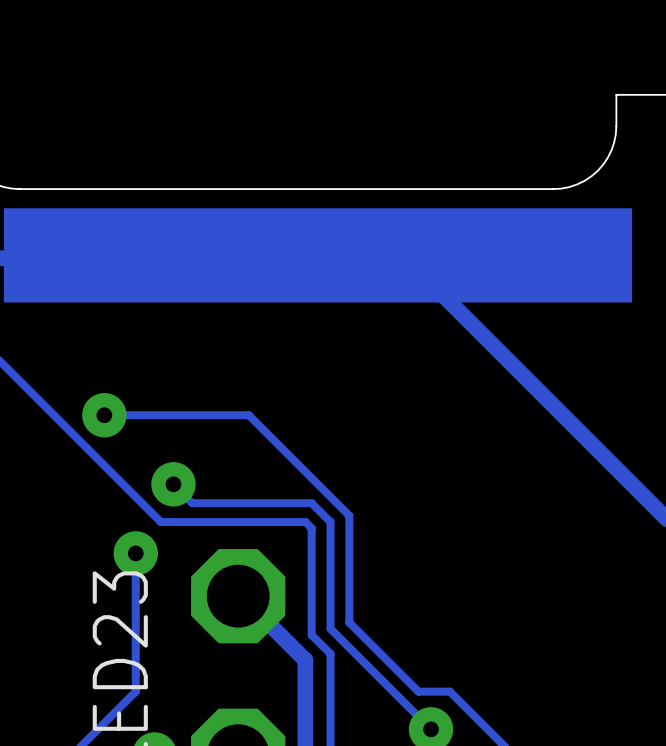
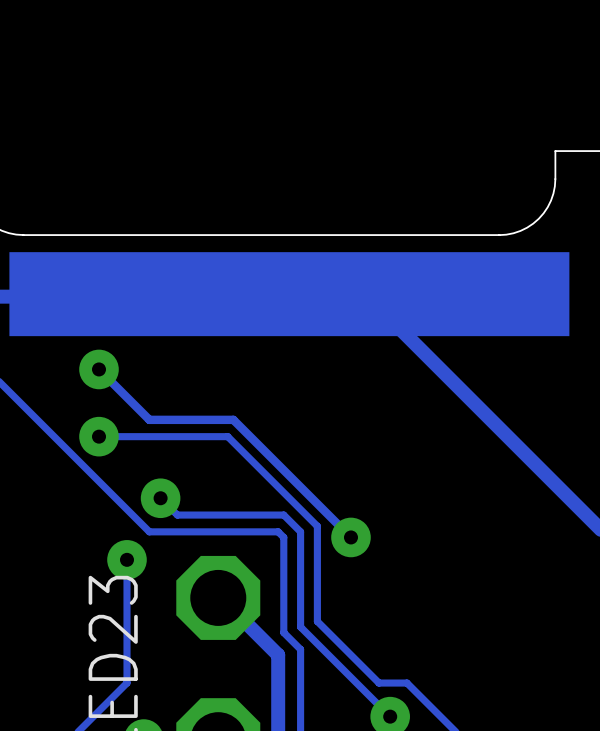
track: none -> (99, 369) (149, 419) (233, 419) (350, 537)
via: none -> (99, 369)
via: none -> (350, 537)

